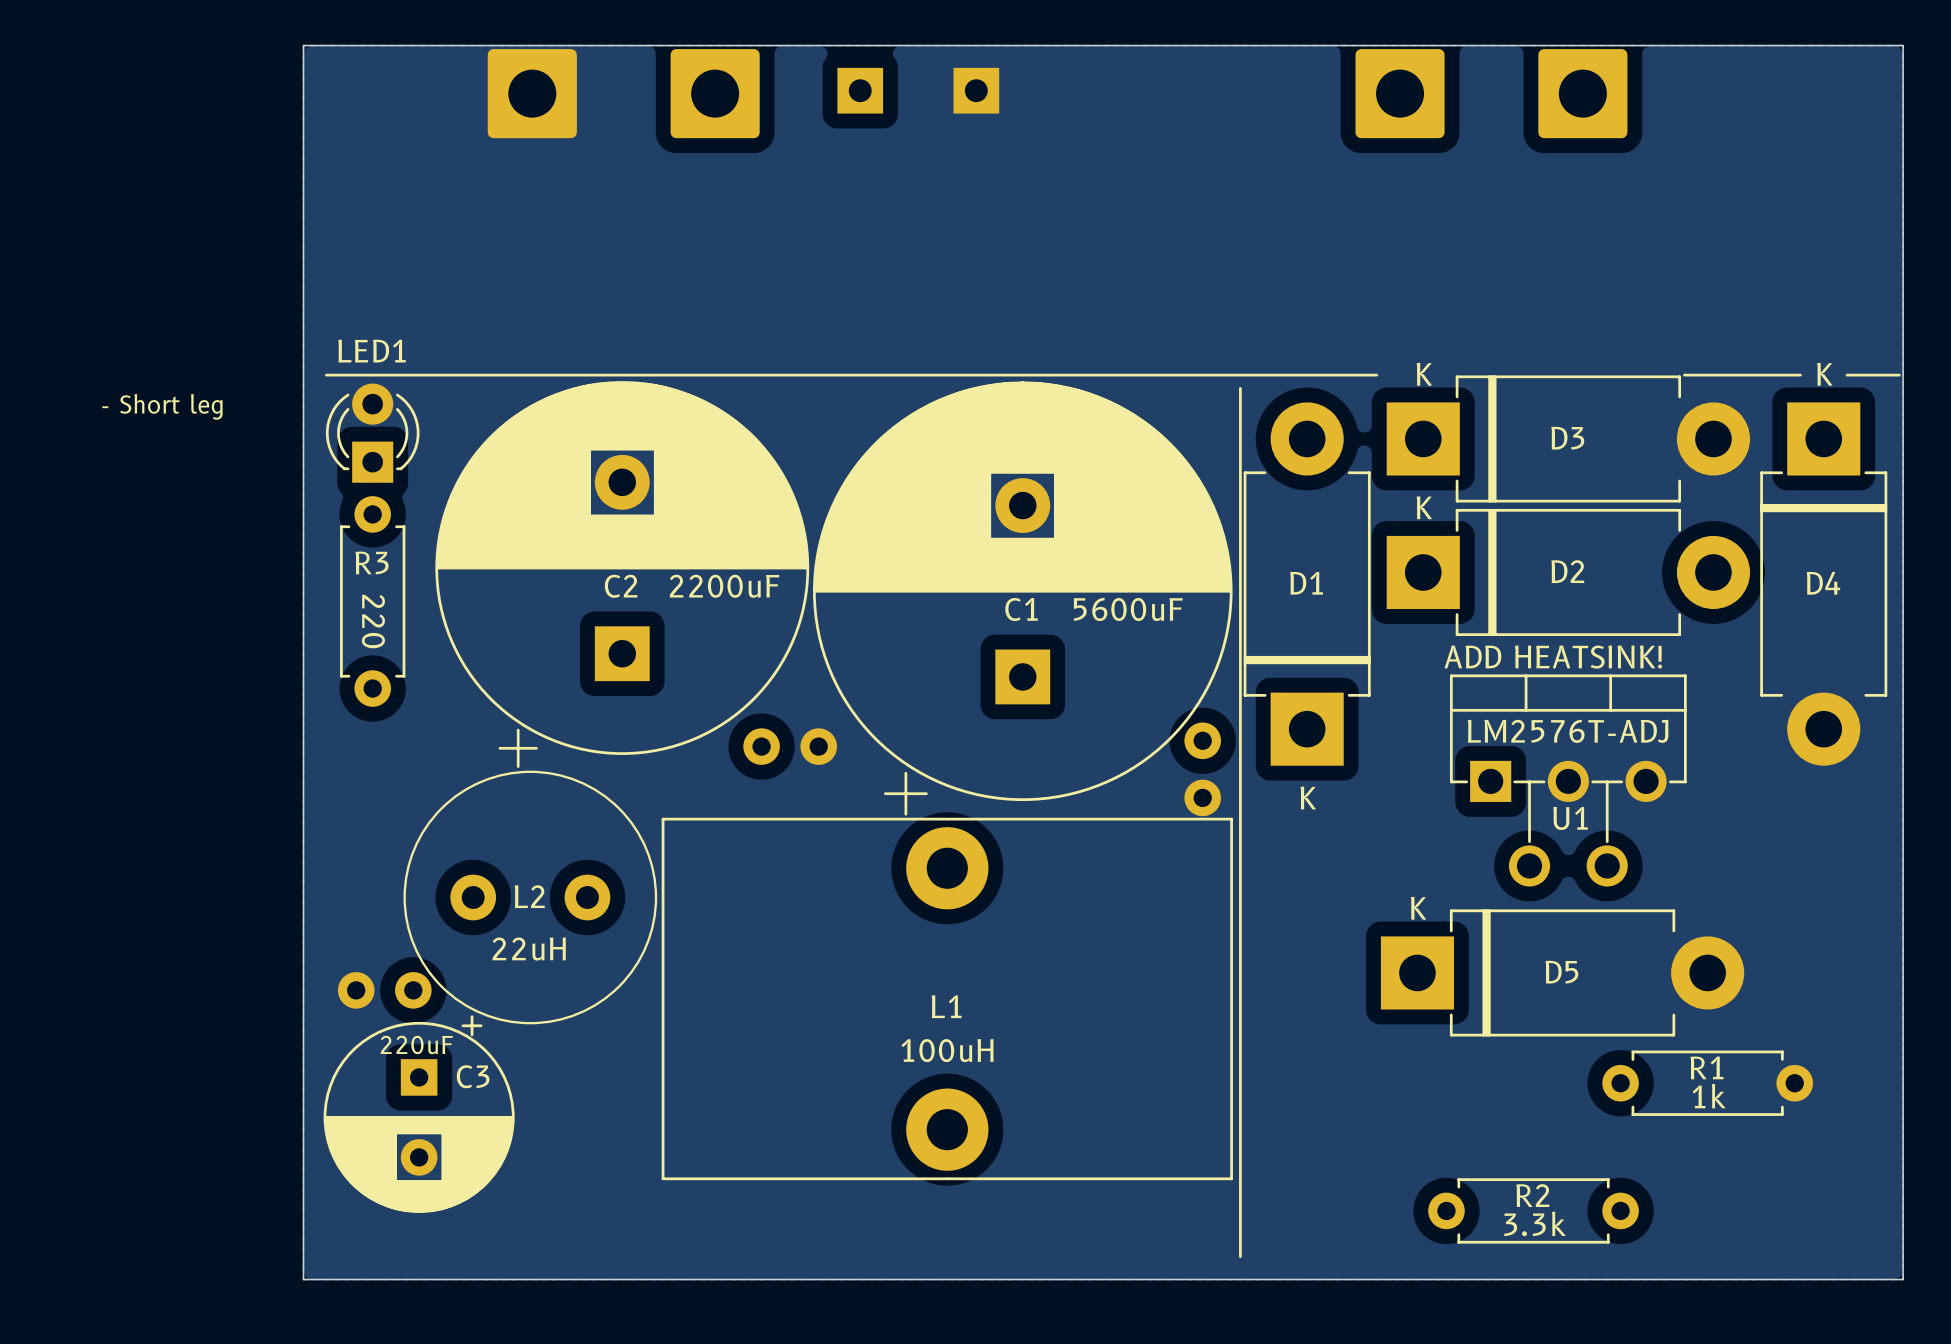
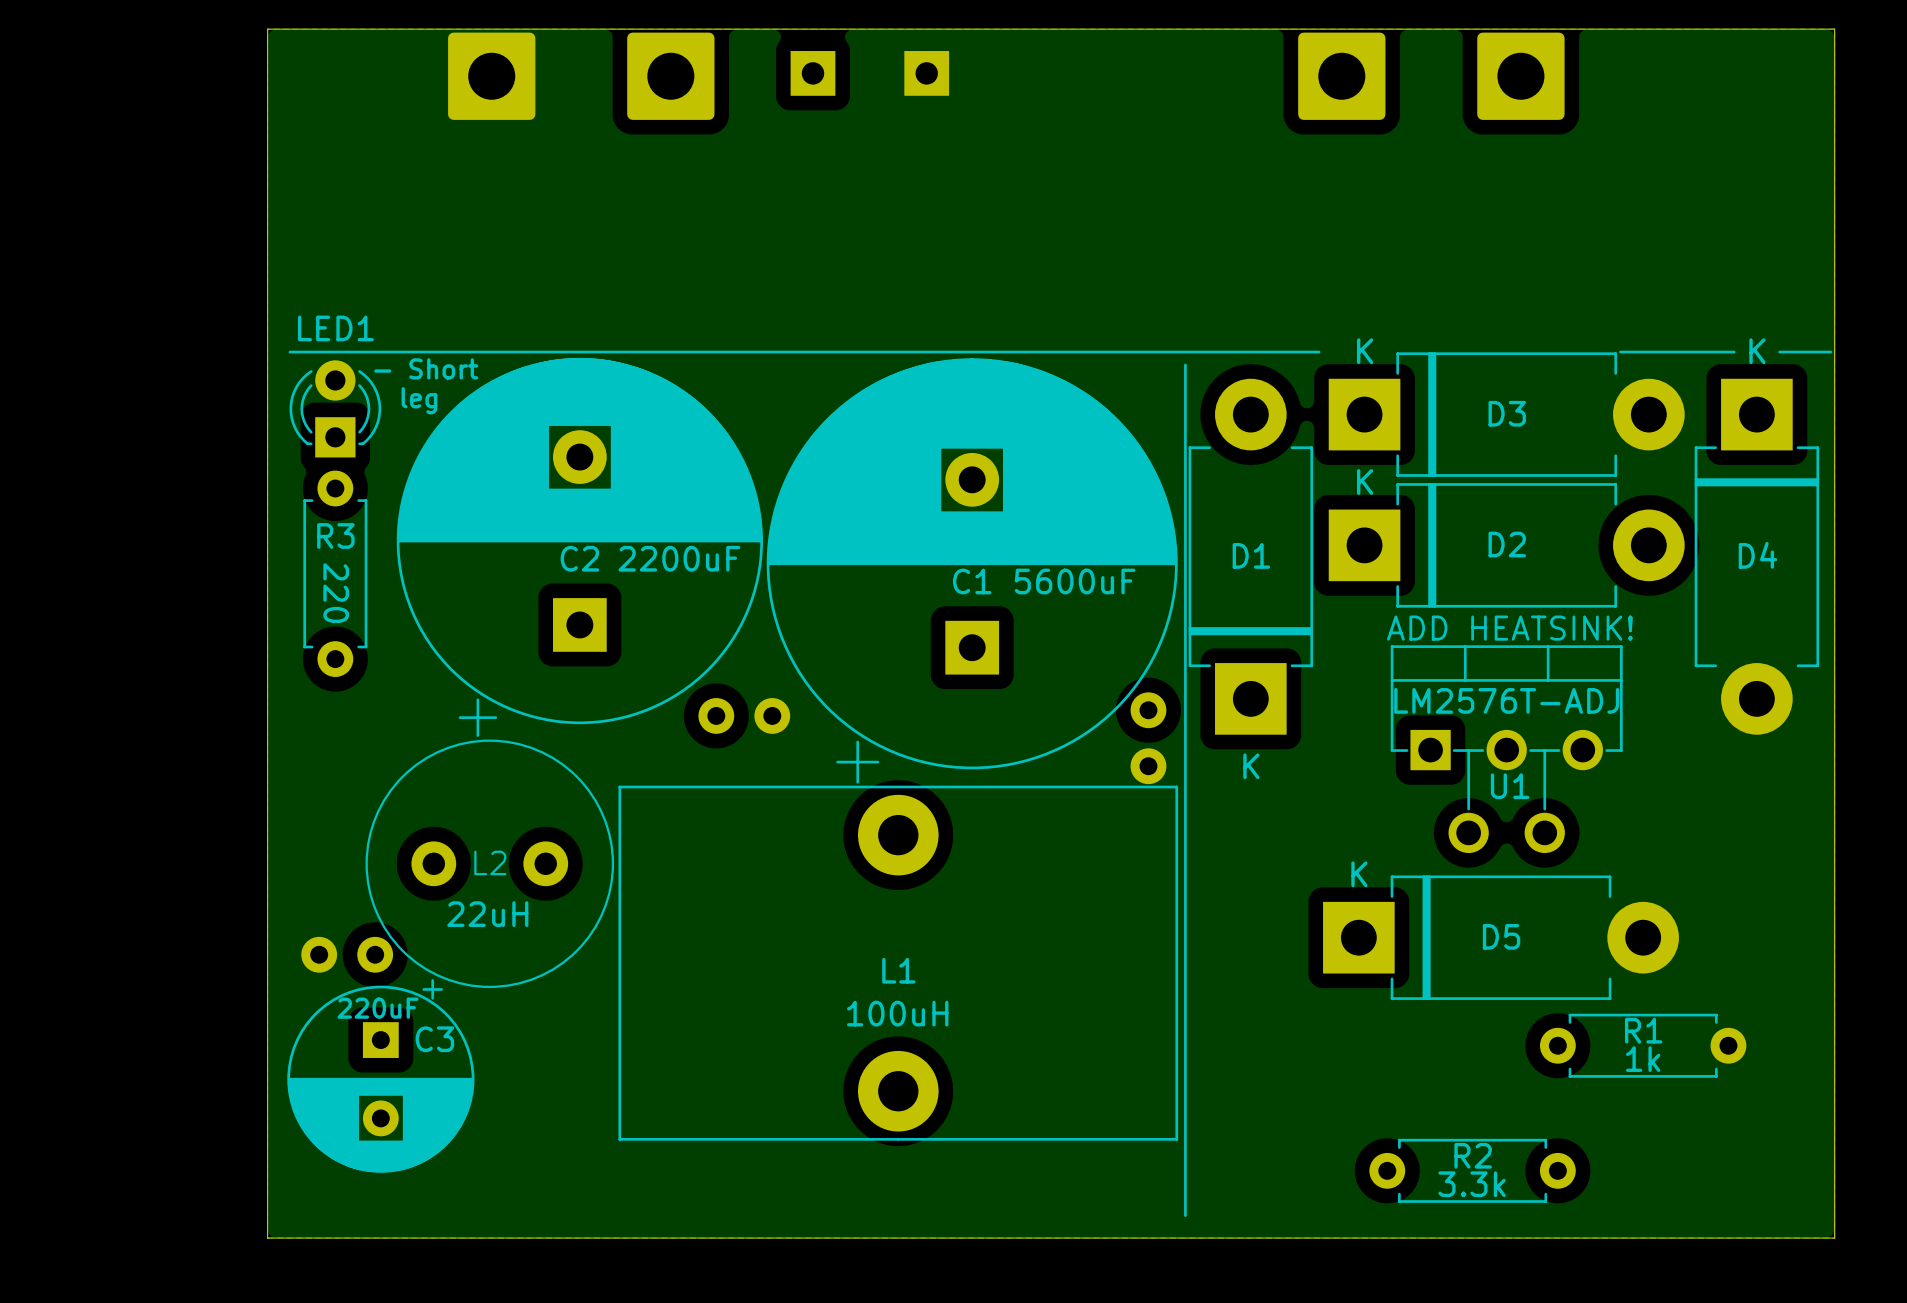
text: none -> - Short (426, 368)
text: - Short leg (162, 406) -> none
text: none -> leg (419, 400)

